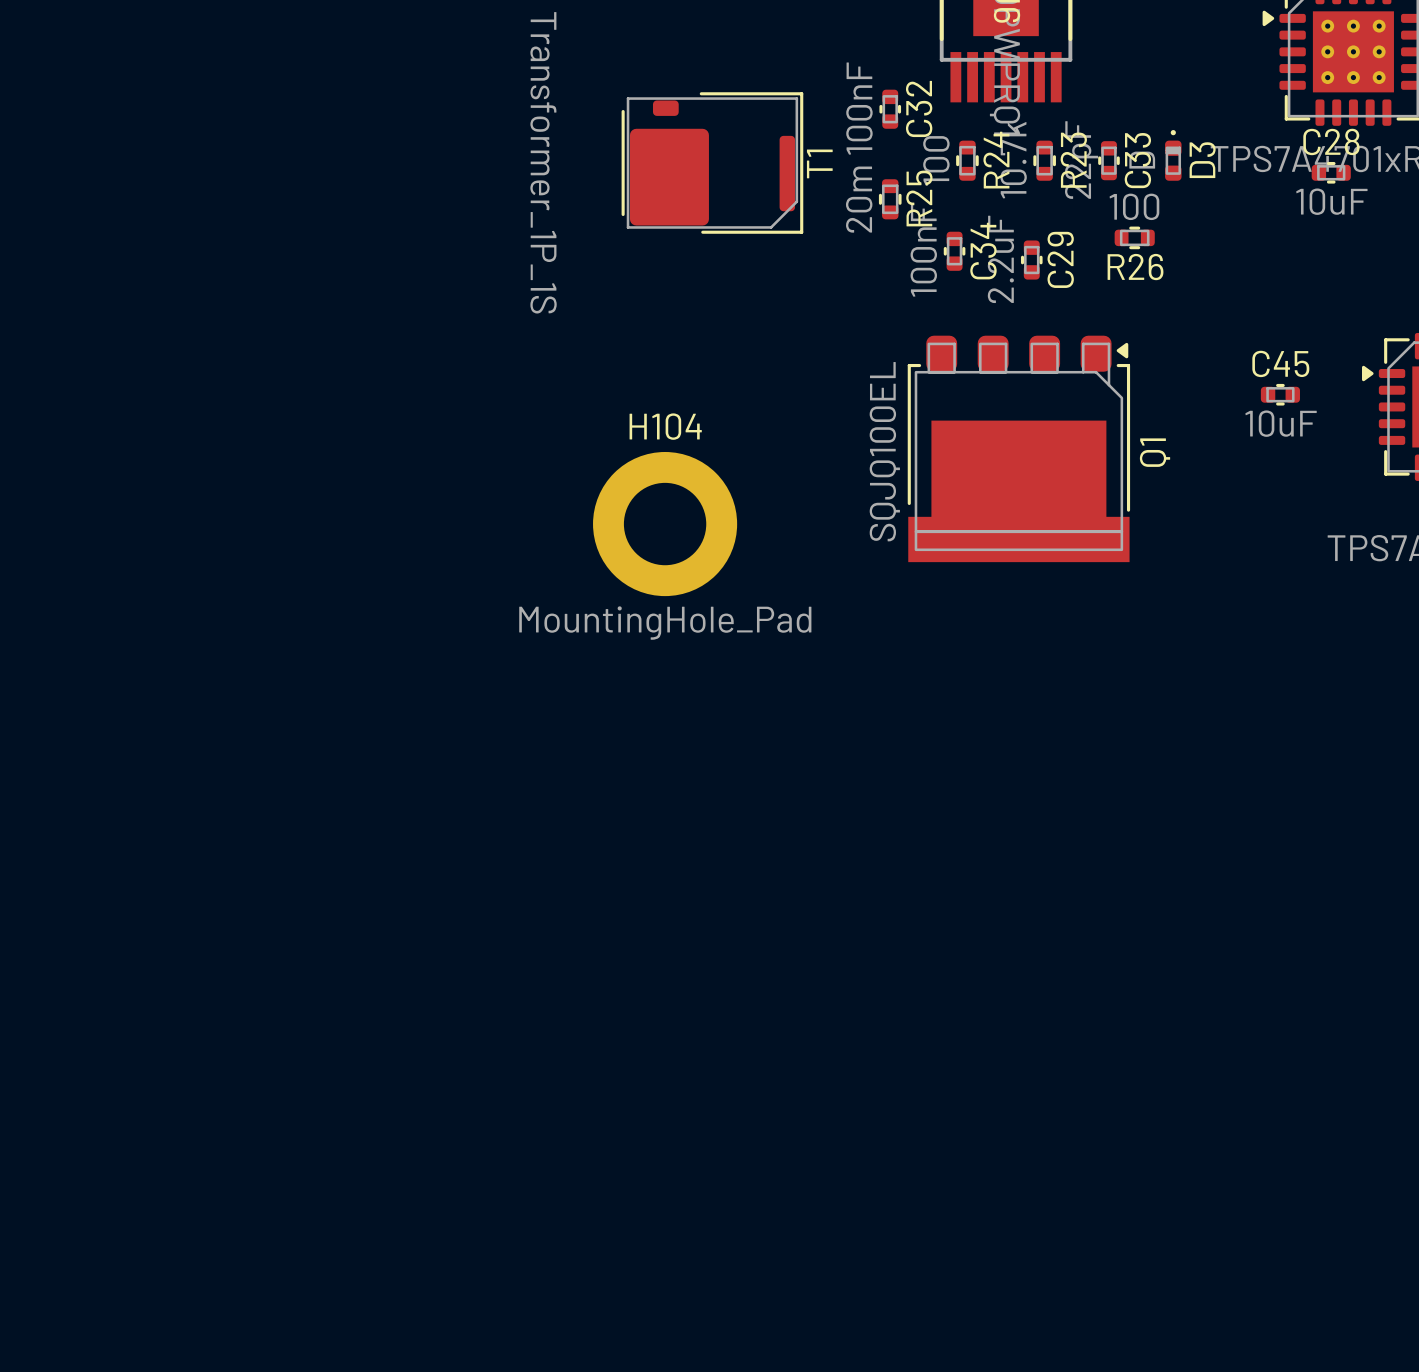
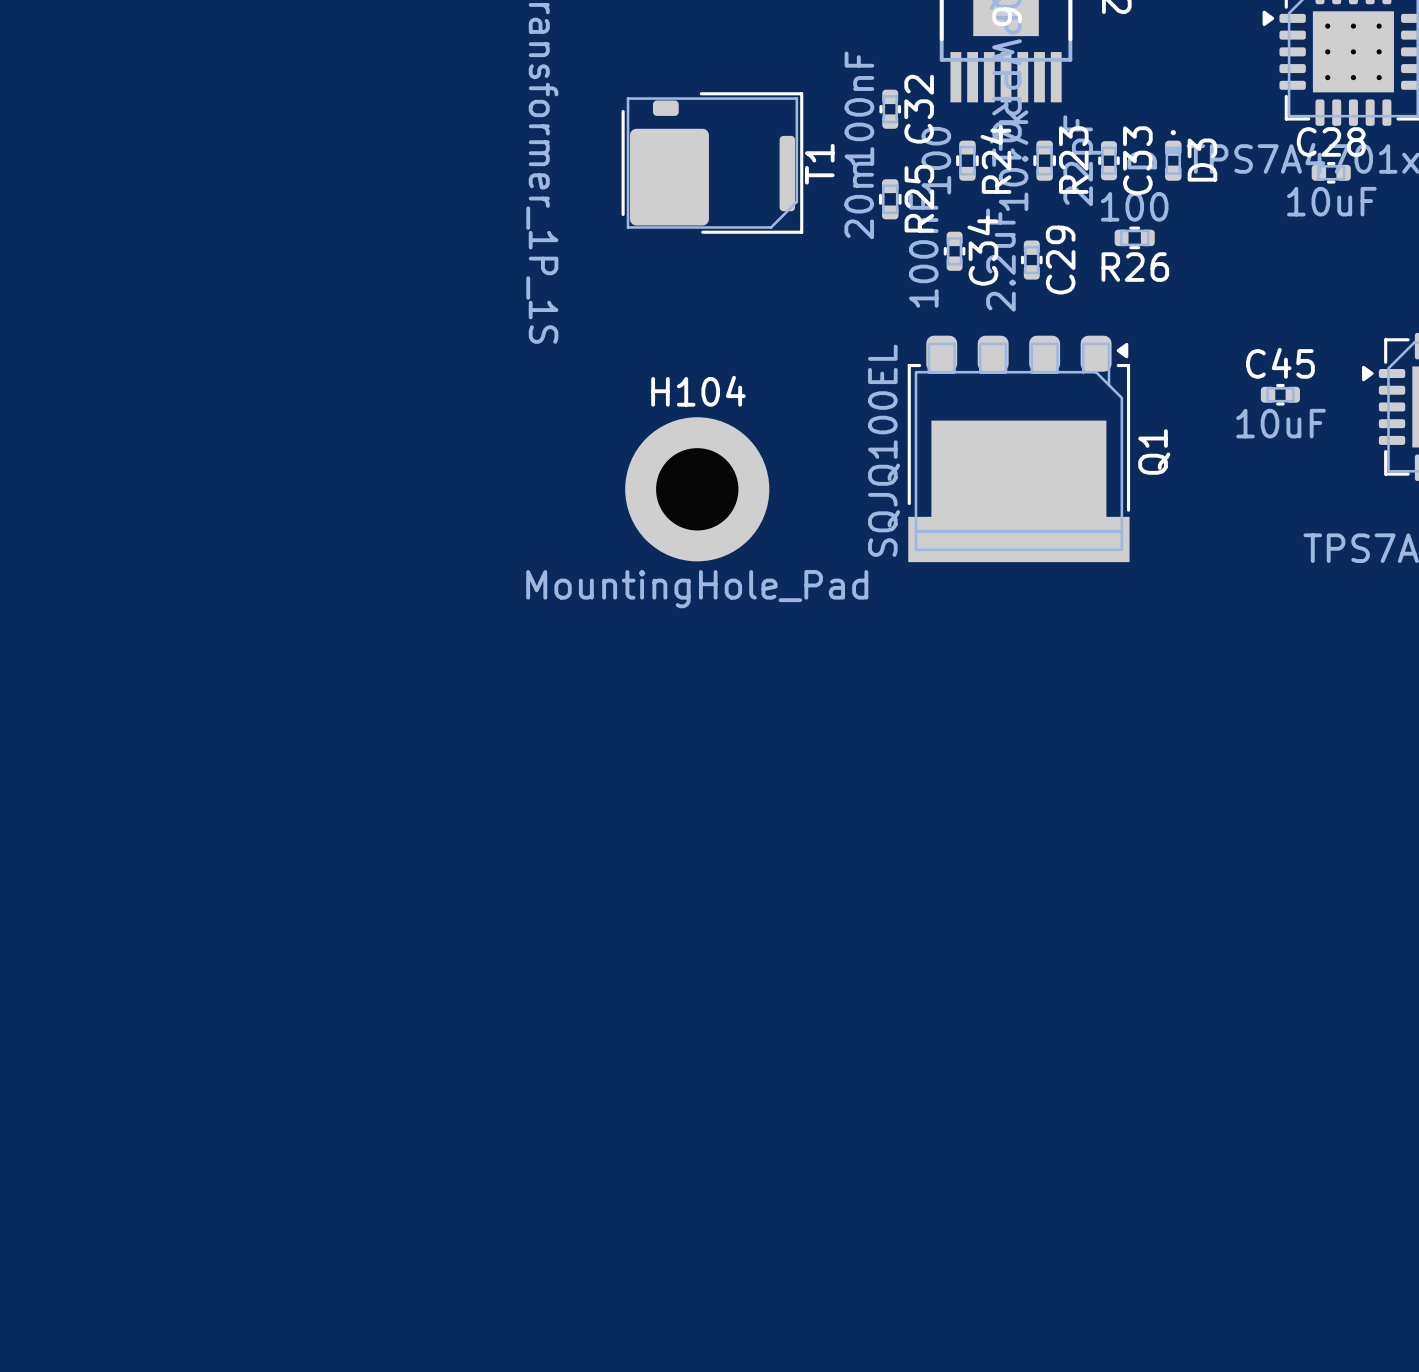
H104 position: (665, 524) -> (697, 489)

